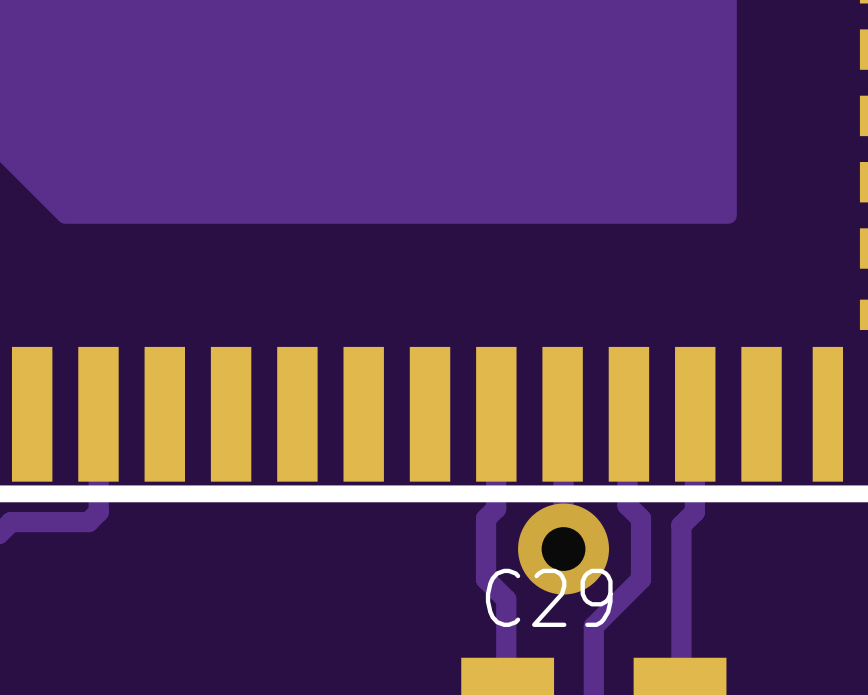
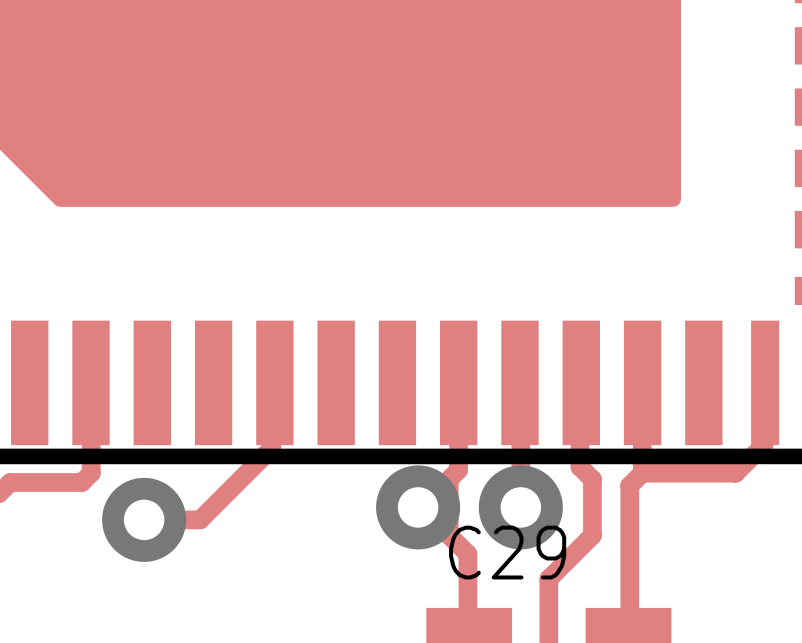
track: none -> (274, 382) (271, 382) (271, 448) (200, 519) (144, 519)
track: none -> (763, 382) (763, 445) (735, 473) (642, 473)
via: none -> (418, 507)
via: none -> (144, 519)

